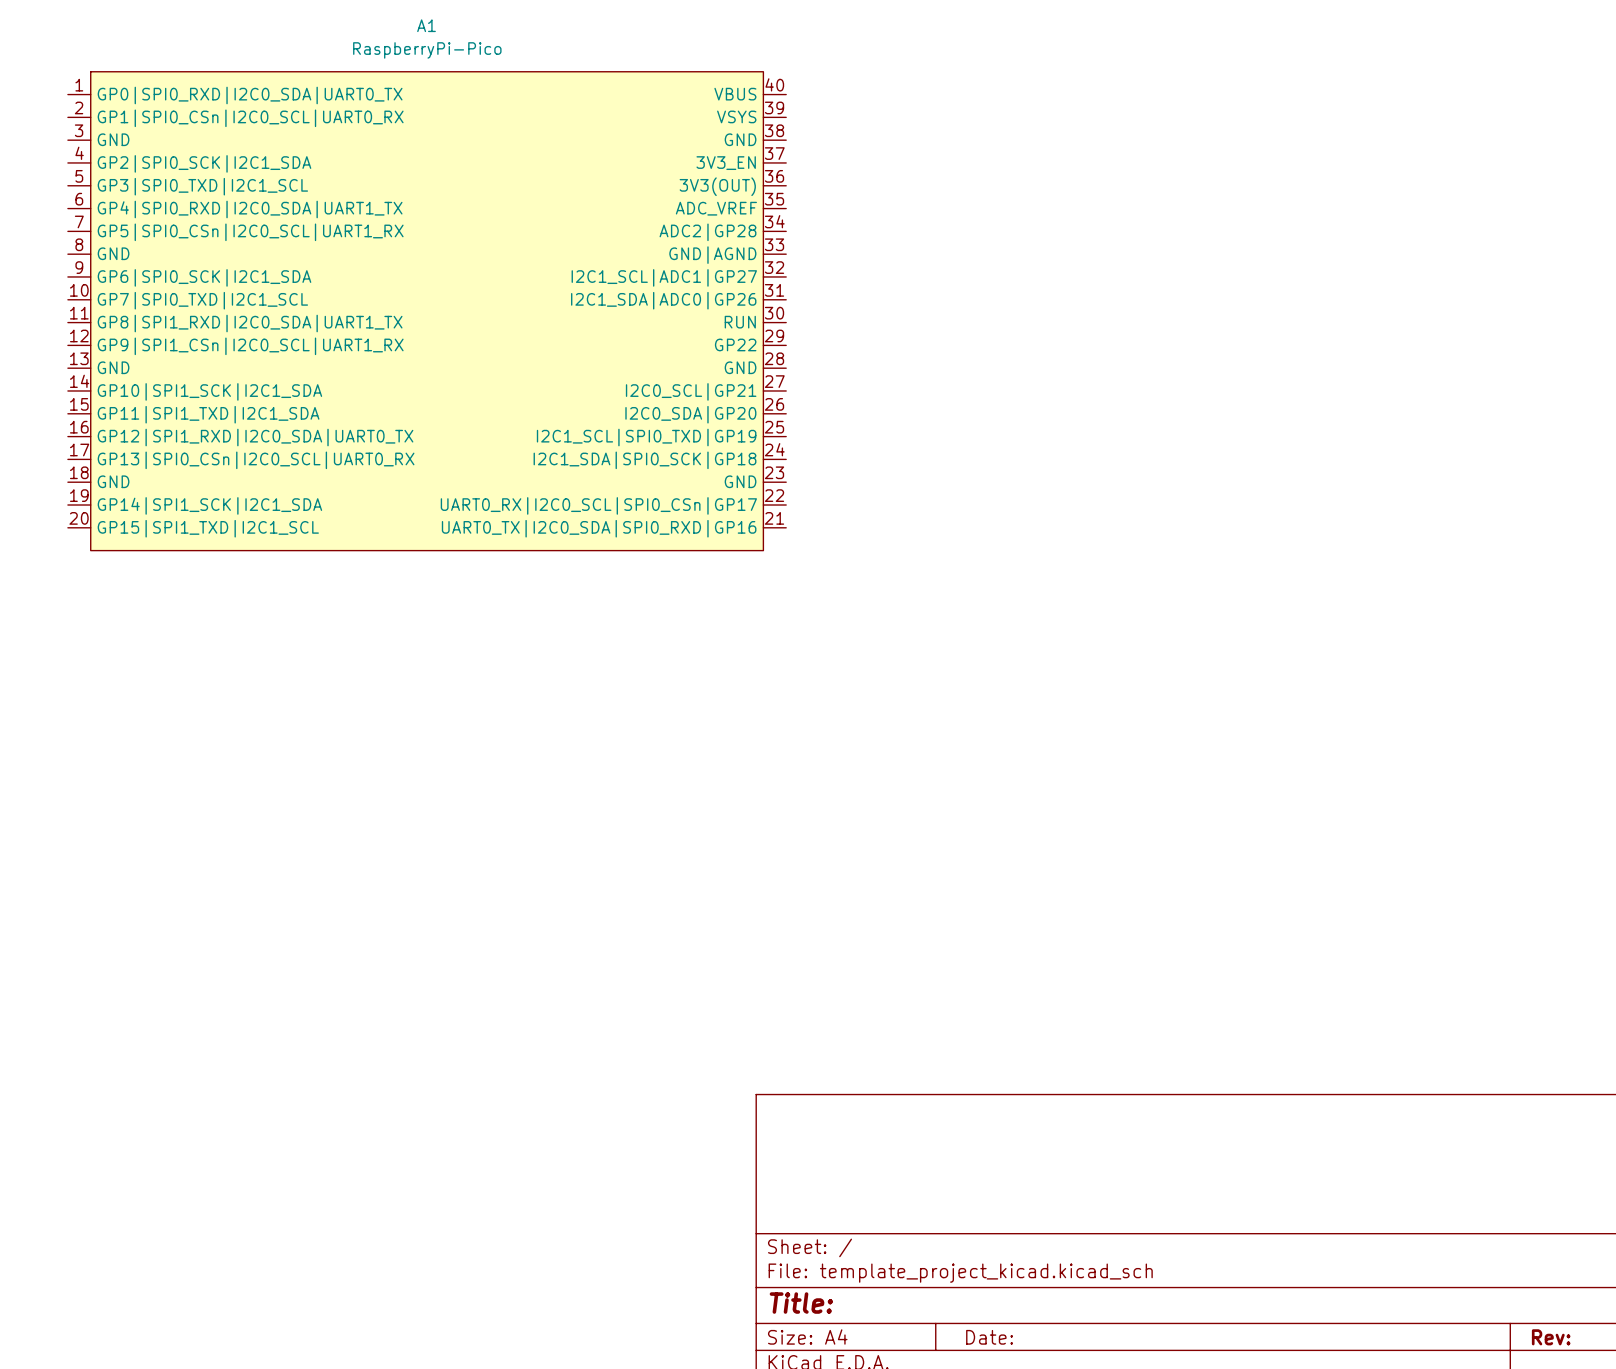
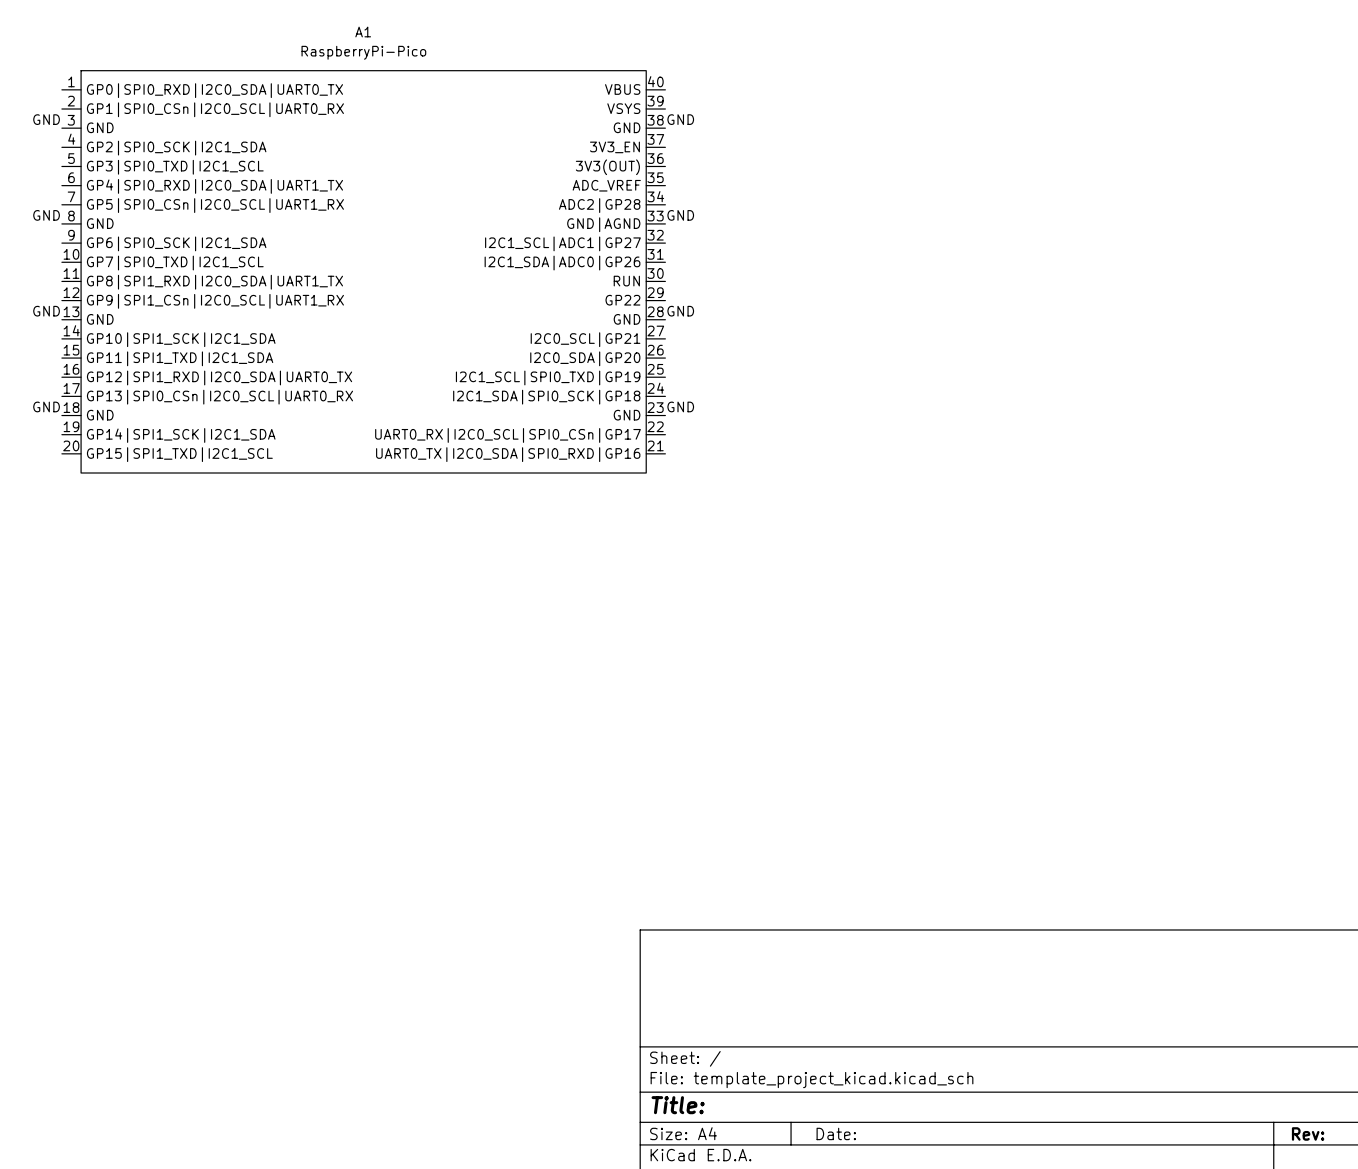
label: none -> GND (46, 119)
label: none -> GND (680, 119)
label: none -> GND (46, 215)
label: none -> GND (680, 215)
label: none -> GND (46, 311)
label: none -> GND (680, 311)
label: none -> GND (46, 406)
label: none -> GND (680, 406)

